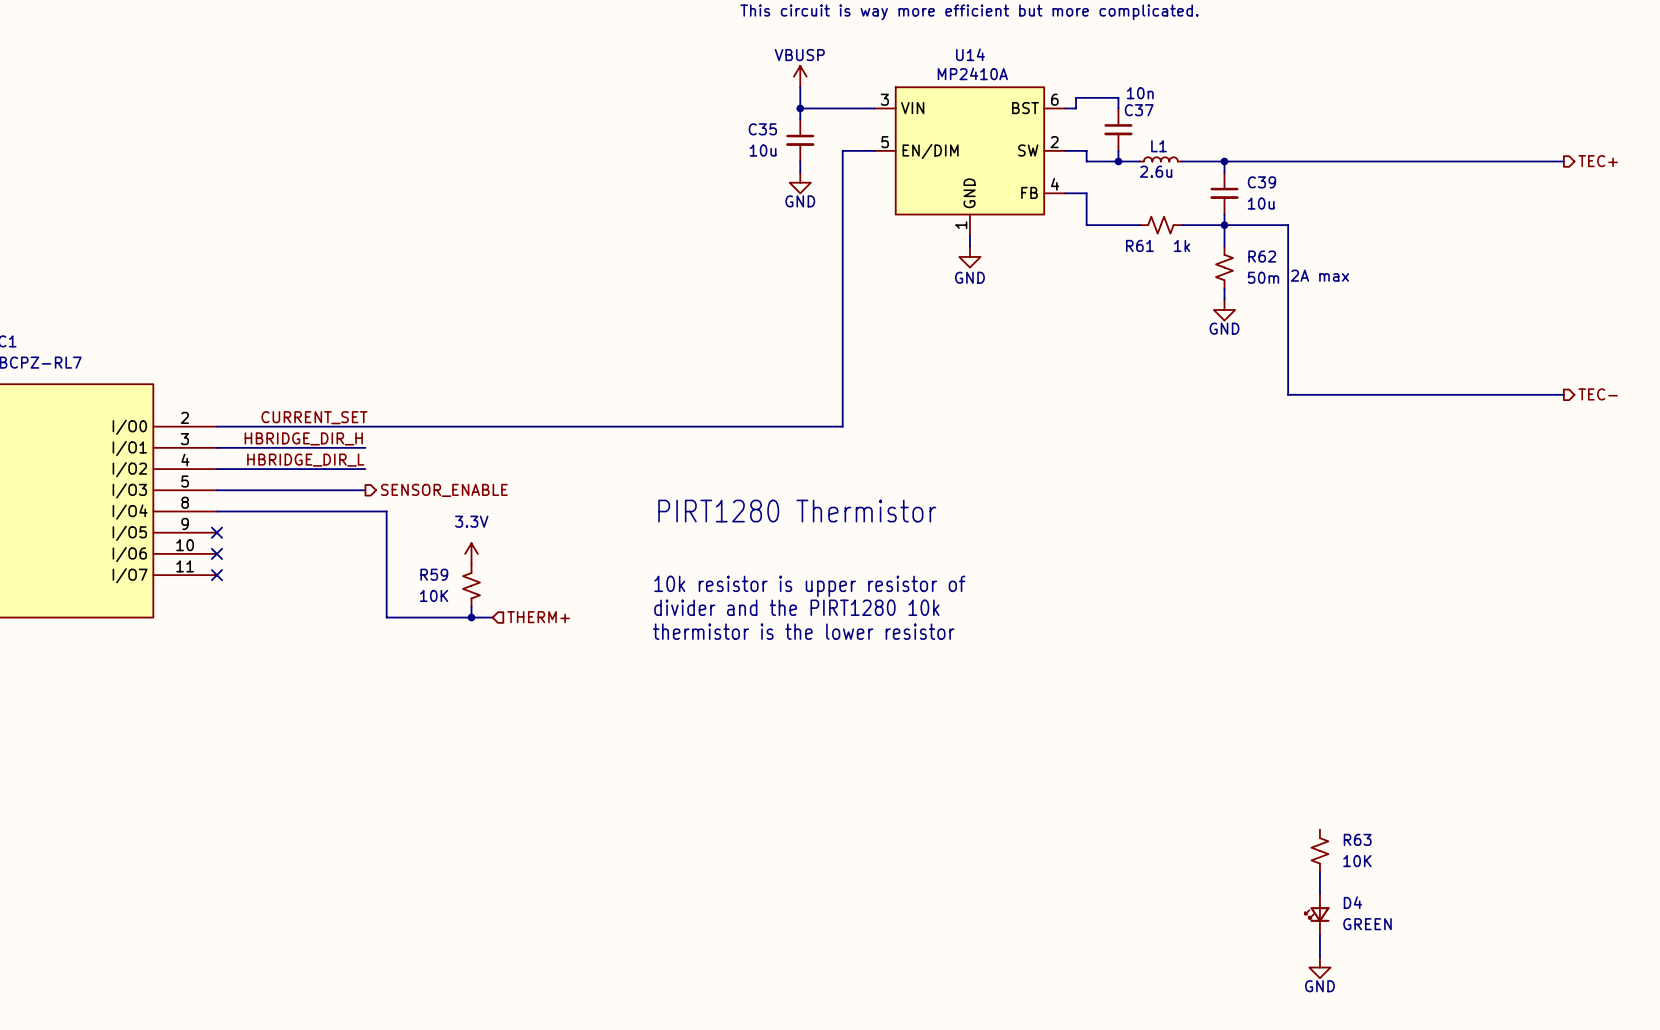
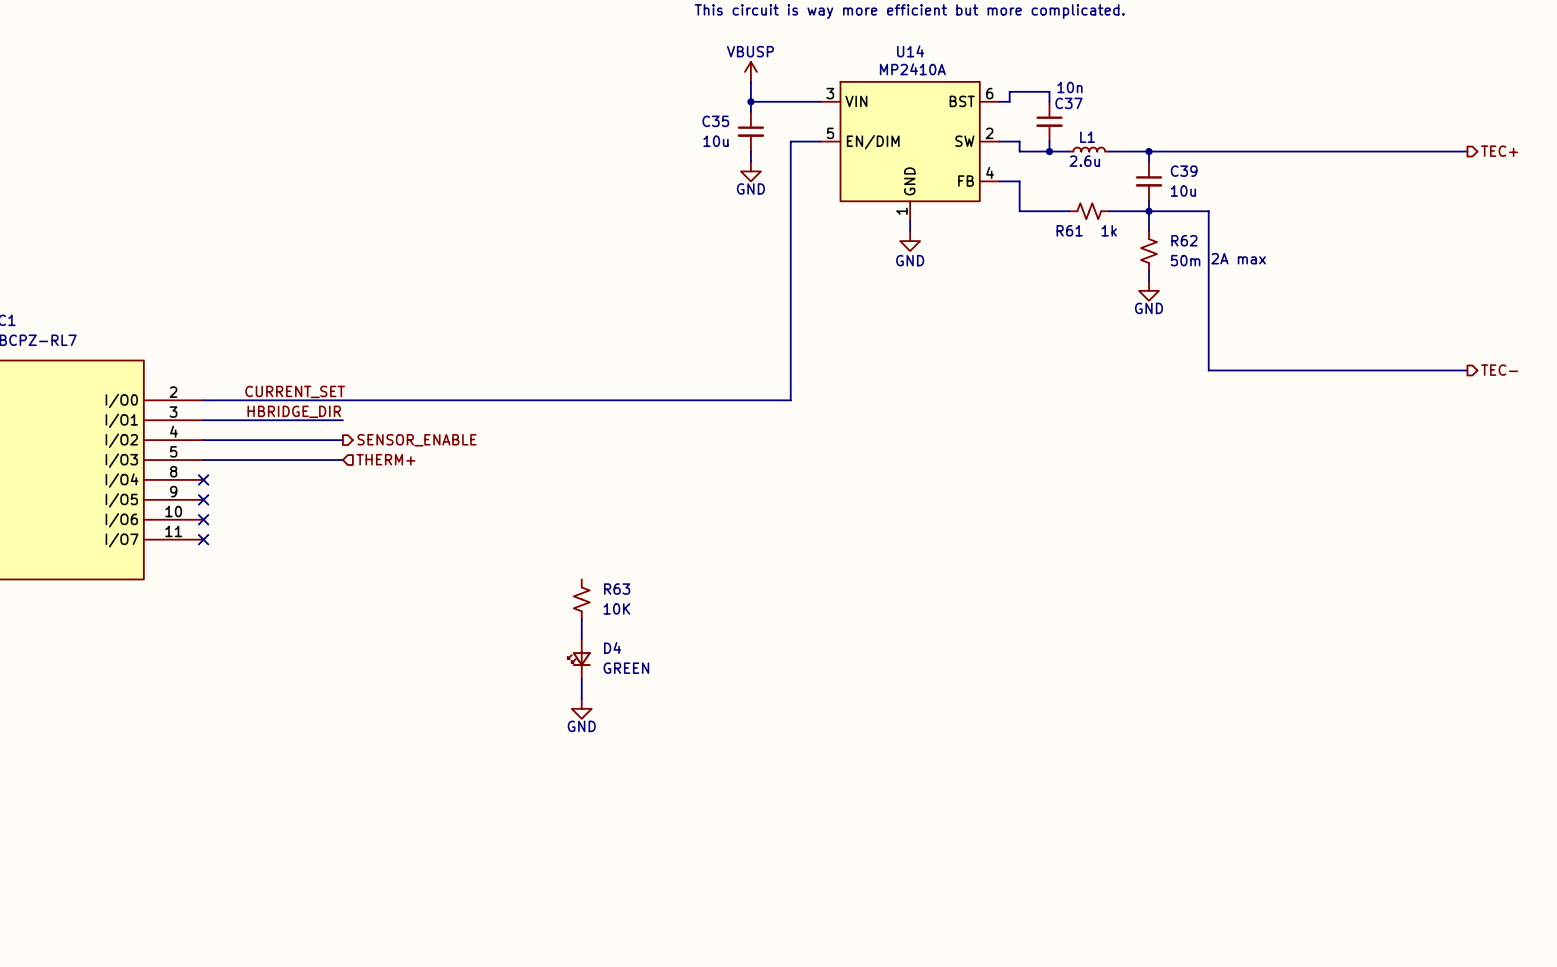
label: HBRIDGE_DIR_H (303, 438) -> HBRIDGE_DIR (294, 411)
label: HBRIDGE_DIR_L (305, 460) -> none
hierarchical label: none -> SENSOR_ENABLE (416, 440)
hierarchical label shape: output (444, 490) -> input (385, 459)
hierarchical label: SENSOR_ENABLE (444, 490) -> THERM+ (385, 459)
wire: (216, 511) (386, 511) (386, 617) (492, 617) -> none
no-connect mark: none -> (203, 479)
text: PIRT1280 Thermistor (797, 511) -> none
power symbol: 3.3V (471, 553) -> none
R59: 10K (471, 585) -> none
text: 10k resistor is upper resistor of (809, 586) -> none
wire: (471, 606) (471, 617) -> none
text: divider and the PIRT1280 10k (796, 607) -> none
junction: (471, 617) -> none
hierarchical label: THERM+ (538, 617) -> none
text: thermistor is the lower resistor (803, 631) -> none
wire: none -> (581, 619) (581, 639)
wire: none -> (581, 678) (581, 698)
power symbol: none -> GND (581, 708)
R63 position: (1319, 850) -> (581, 599)
wire: (1319, 872) (1319, 893) -> none
D4 position: (1317, 914) -> (579, 659)
wire: (1319, 935) (1319, 956) -> none
power symbol: GND (1319, 967) -> none

